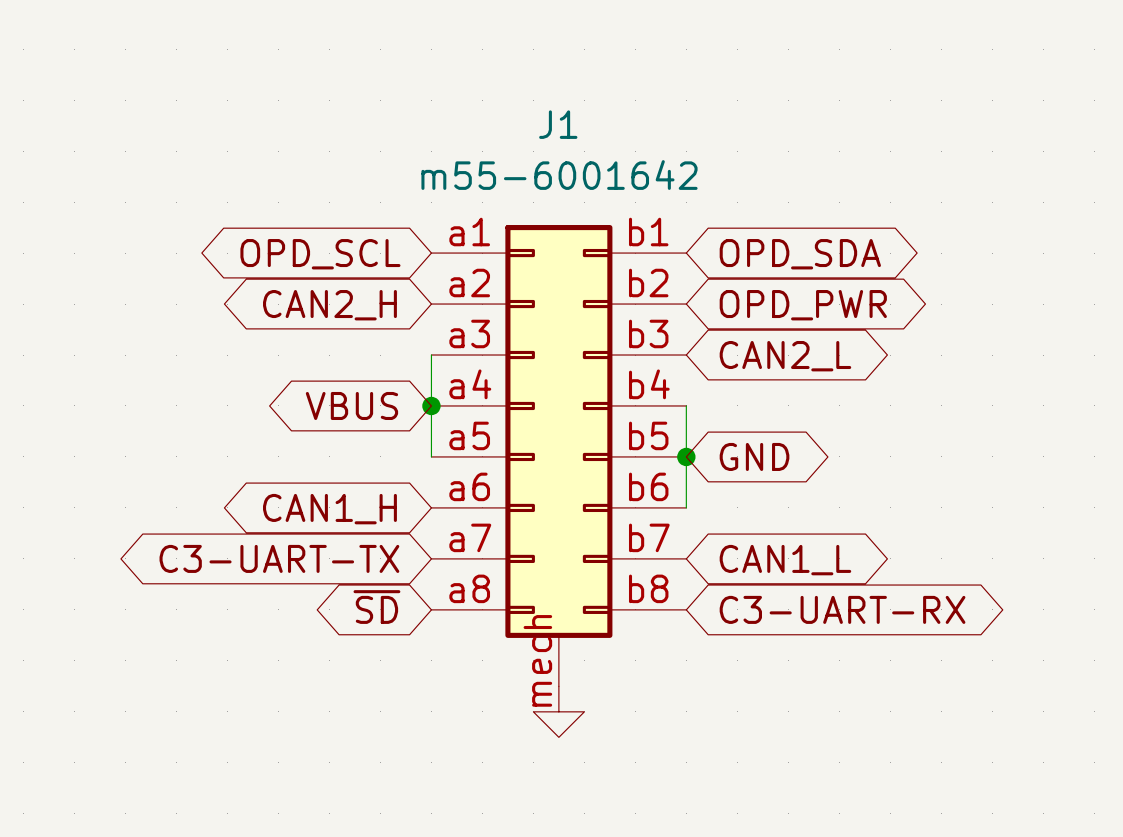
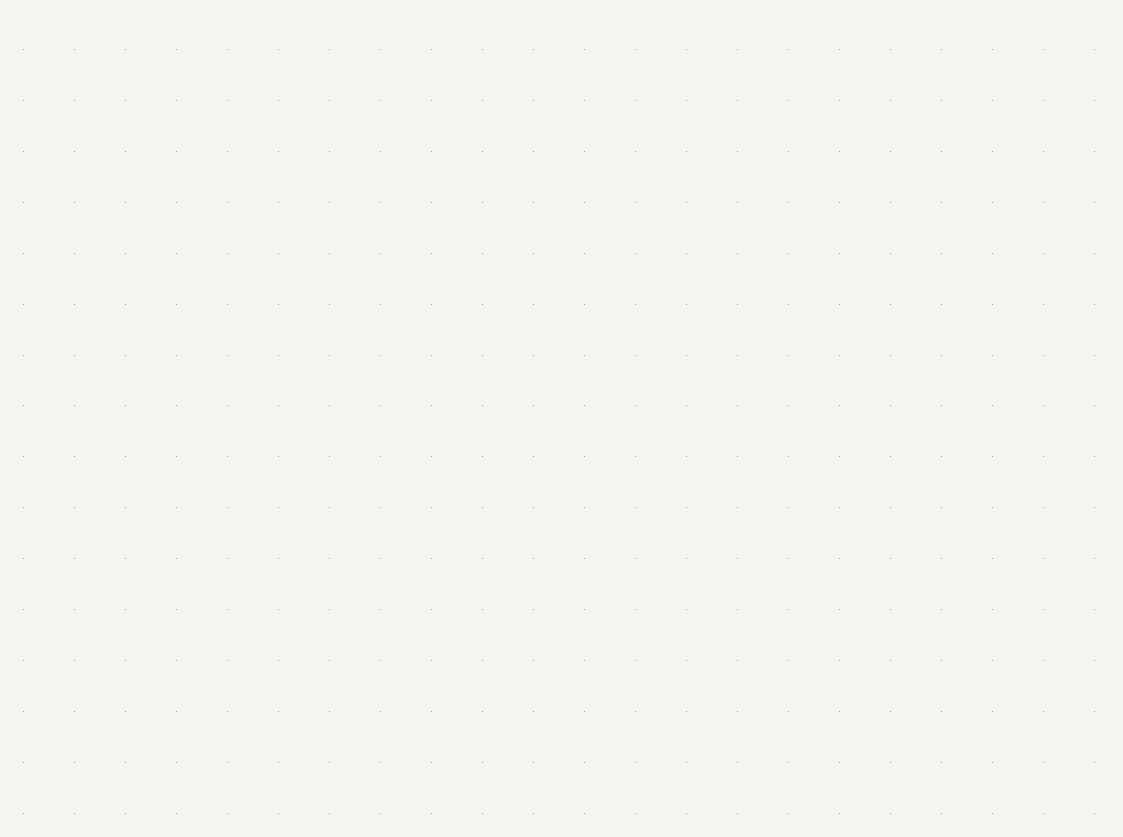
global label: OPD_SCL (320, 254) -> none
global label: OPD_SDA (800, 254) -> none
global label: CAN2_H (329, 305) -> none
global label: OPD_PWR (803, 305) -> none
wire: (431, 355) (431, 456) -> none
global label: CAN2_L (785, 356) -> none
global label: VBUS (351, 405) -> none
junction: (431, 405) -> none
wire: (686, 405) (686, 507) -> none
J1: m55-6001642 (558, 455) -> none
junction: (686, 456) -> none
global label: GND (754, 456) -> none
global label: CAN1_H (329, 509) -> none
global label: C3-UART-TX (279, 558) -> none
global label: CAN1_L (785, 560) -> none
global label: ~{SD} (376, 607) -> none
global label: C3-UART-RX (842, 609) -> none
power symbol: (558, 711) -> none

